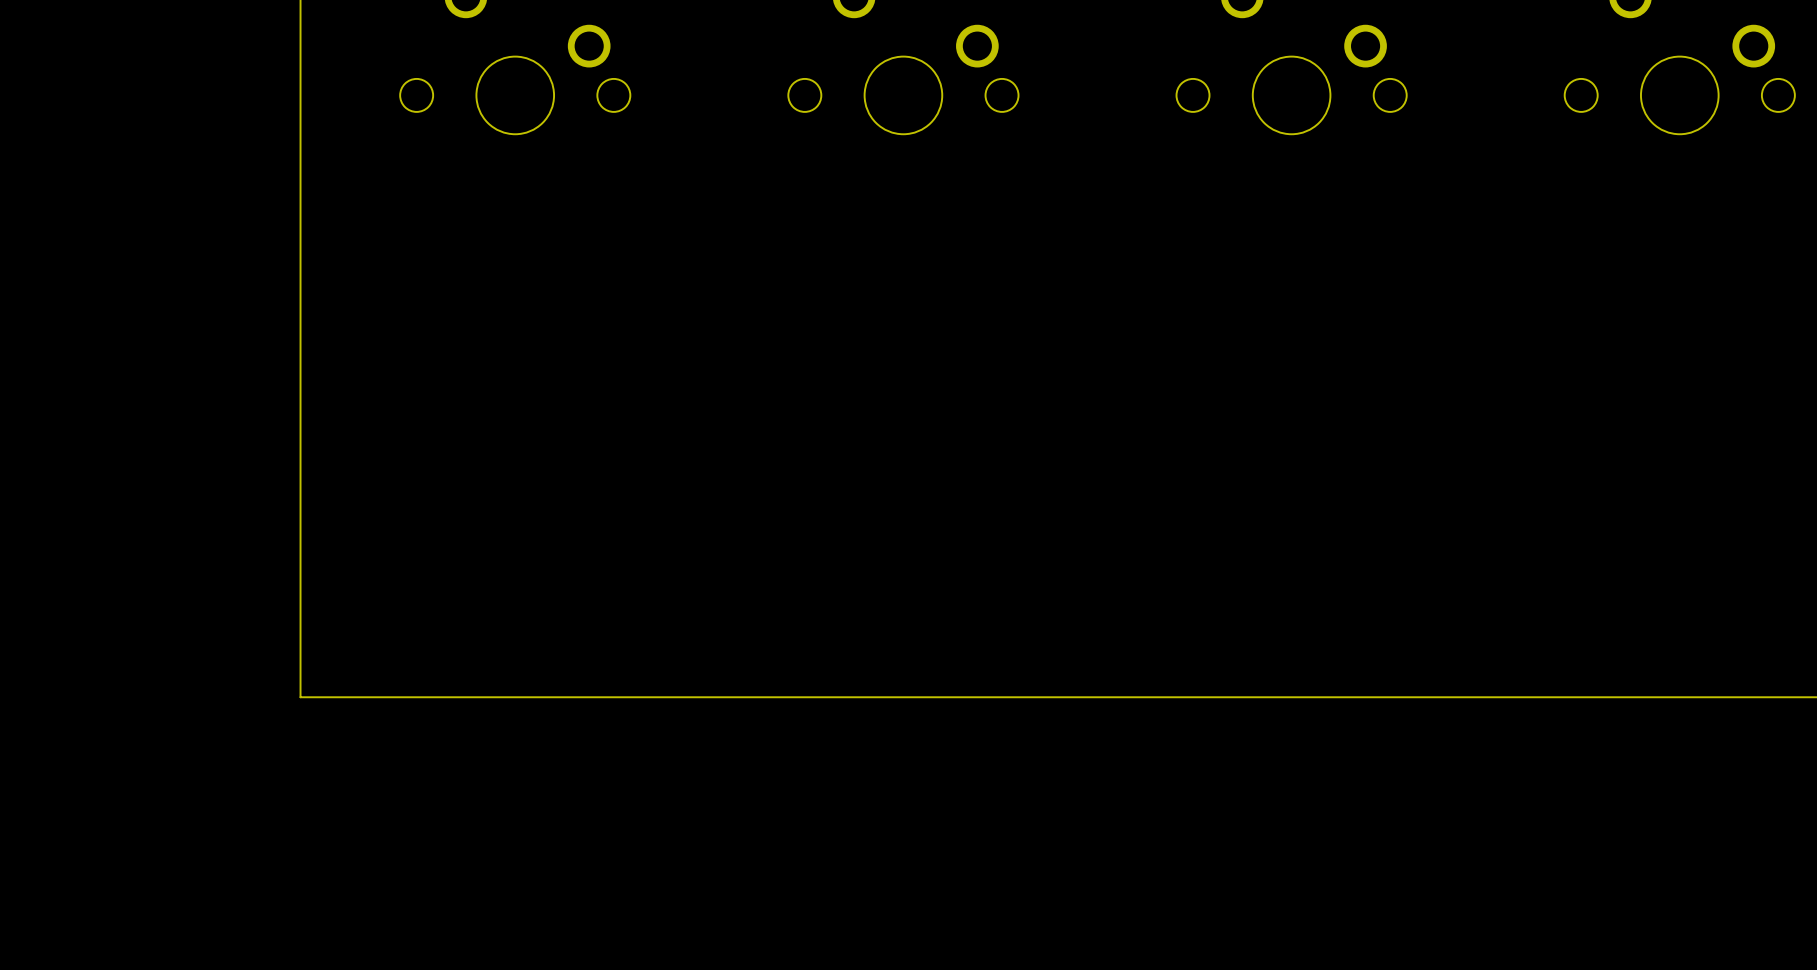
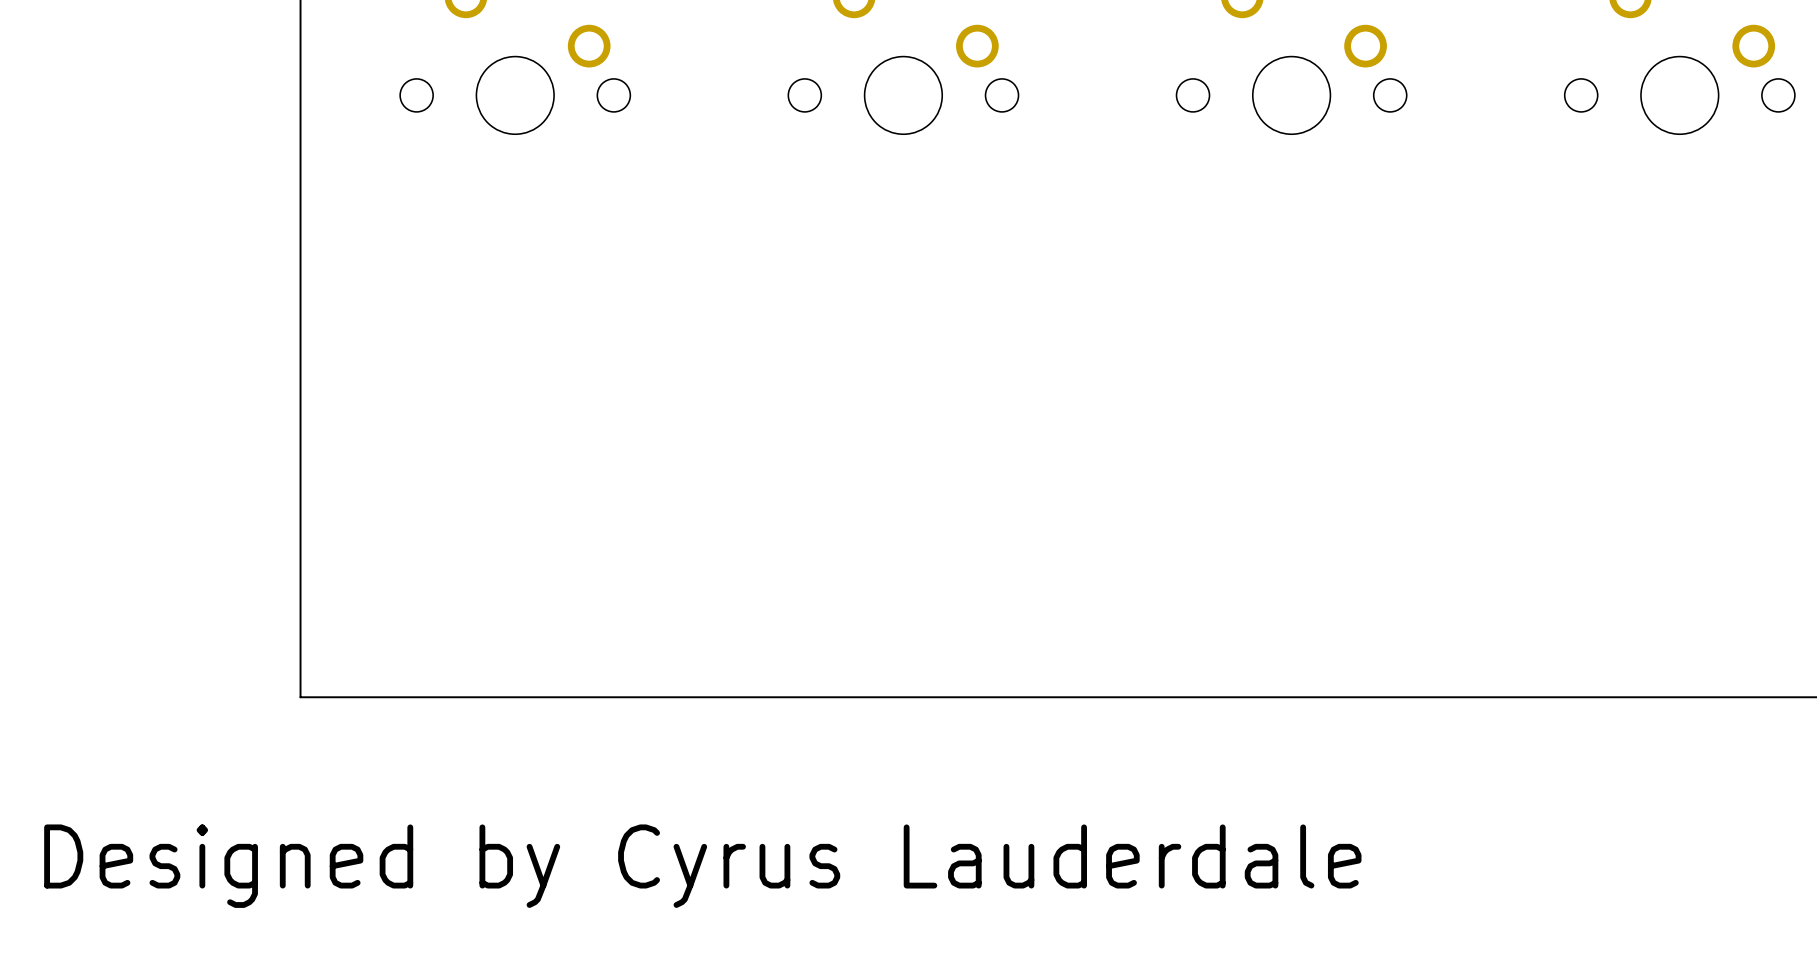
text: none -> Designed by Cyrus Lauderdale (702, 866)

